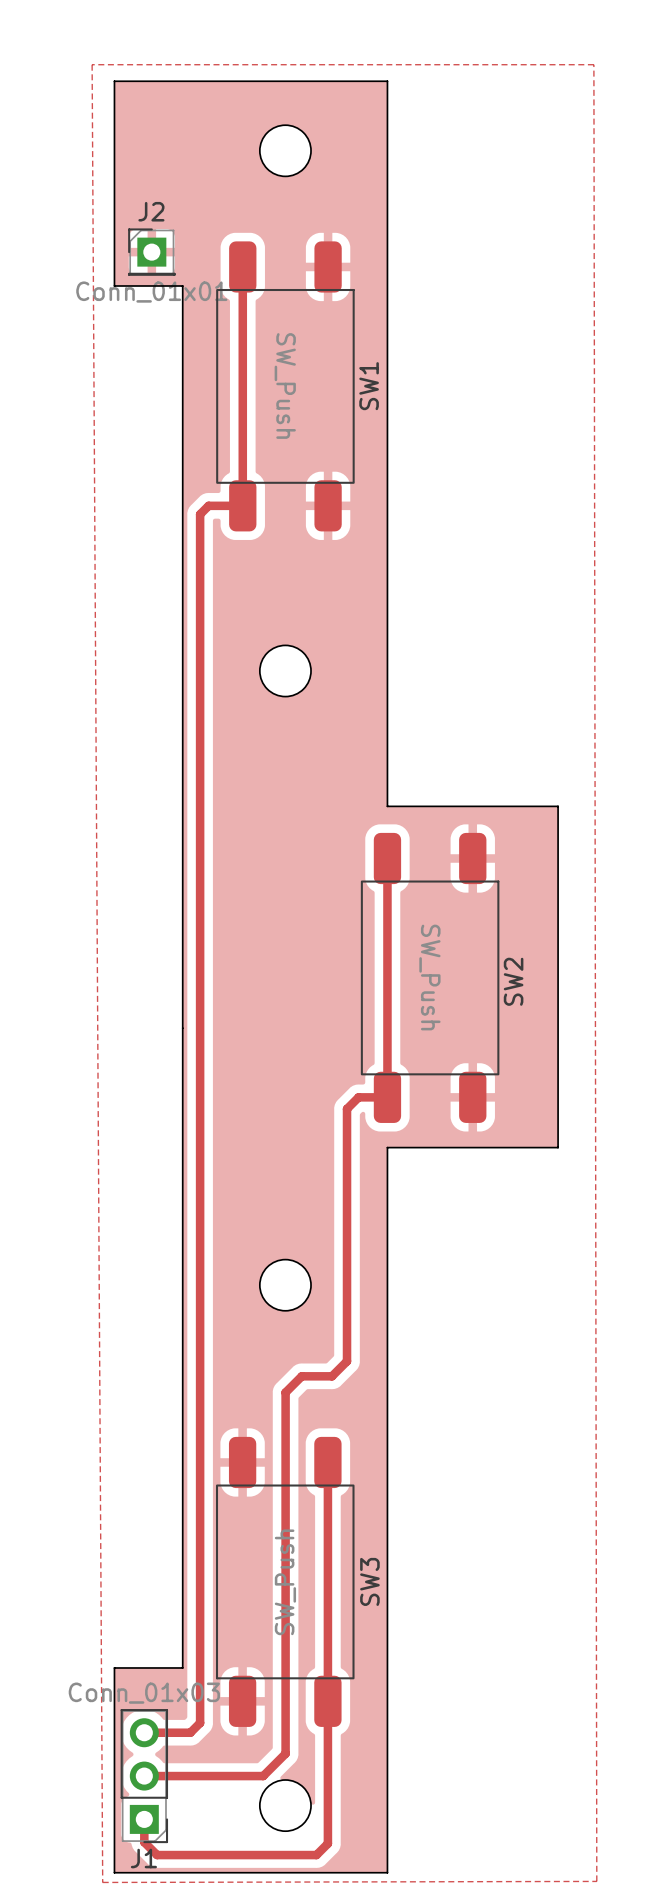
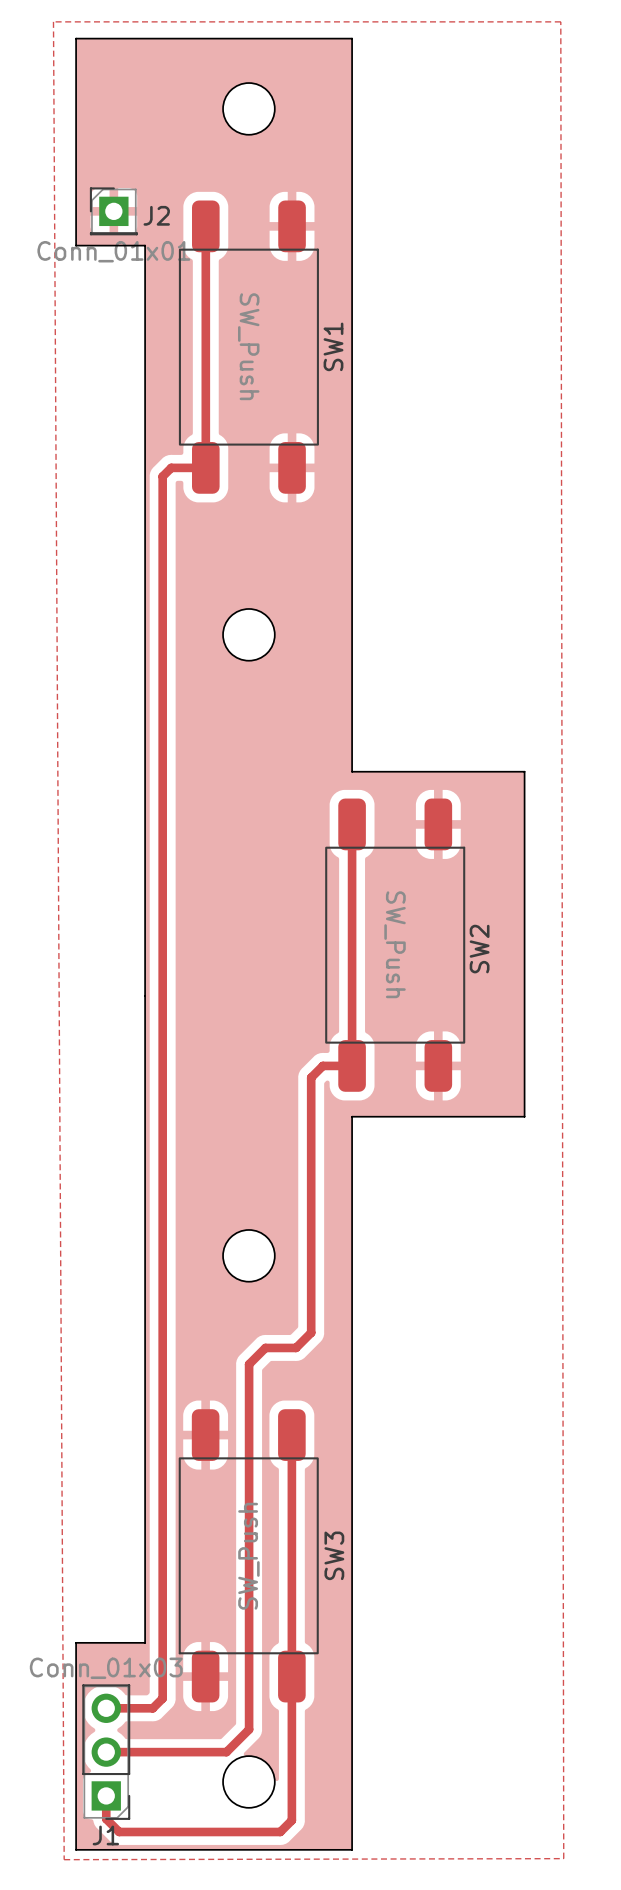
J2 name position: J2 (151, 211) -> J2 (156, 215)

